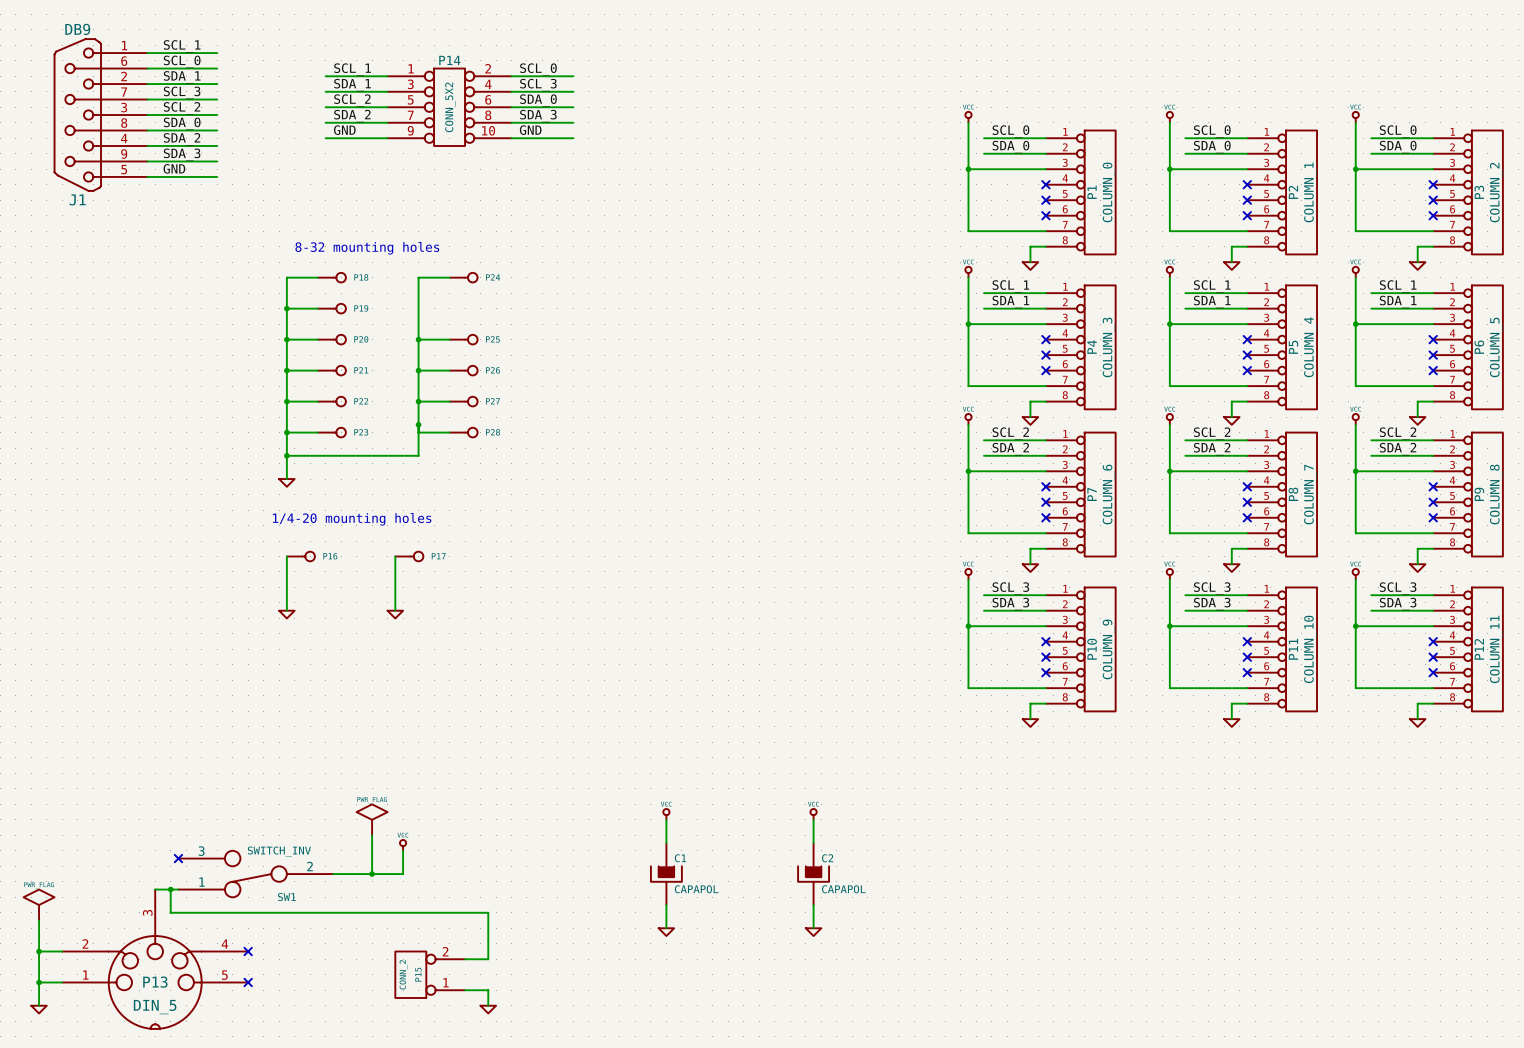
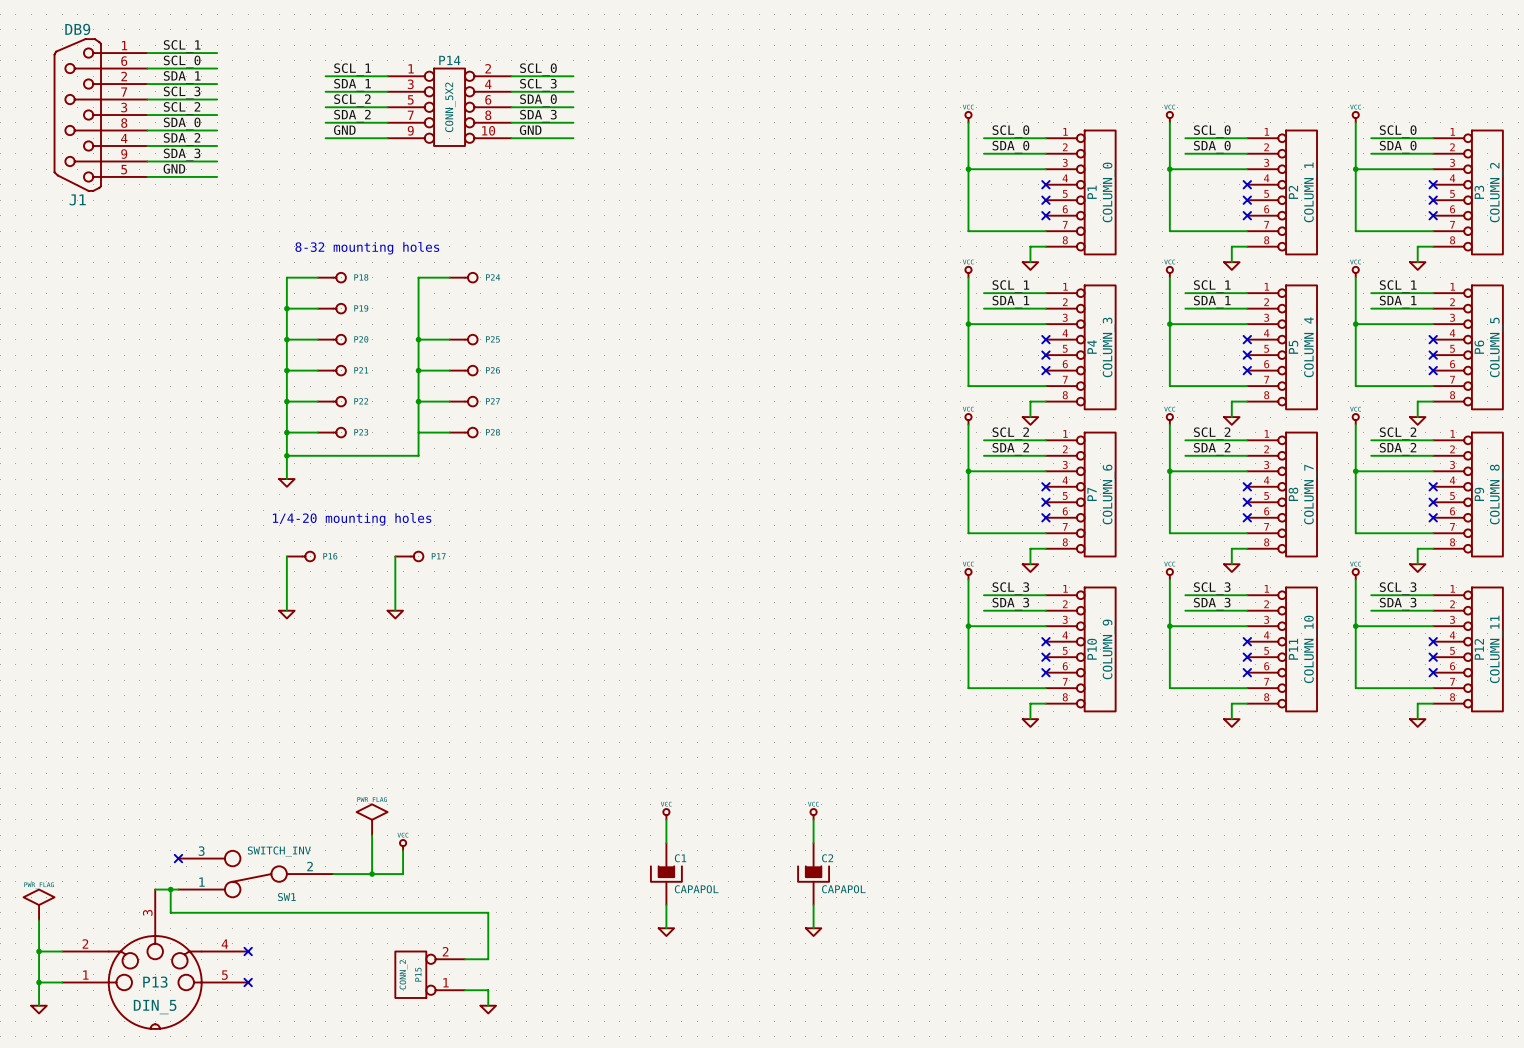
junction: (418, 424) -> none

